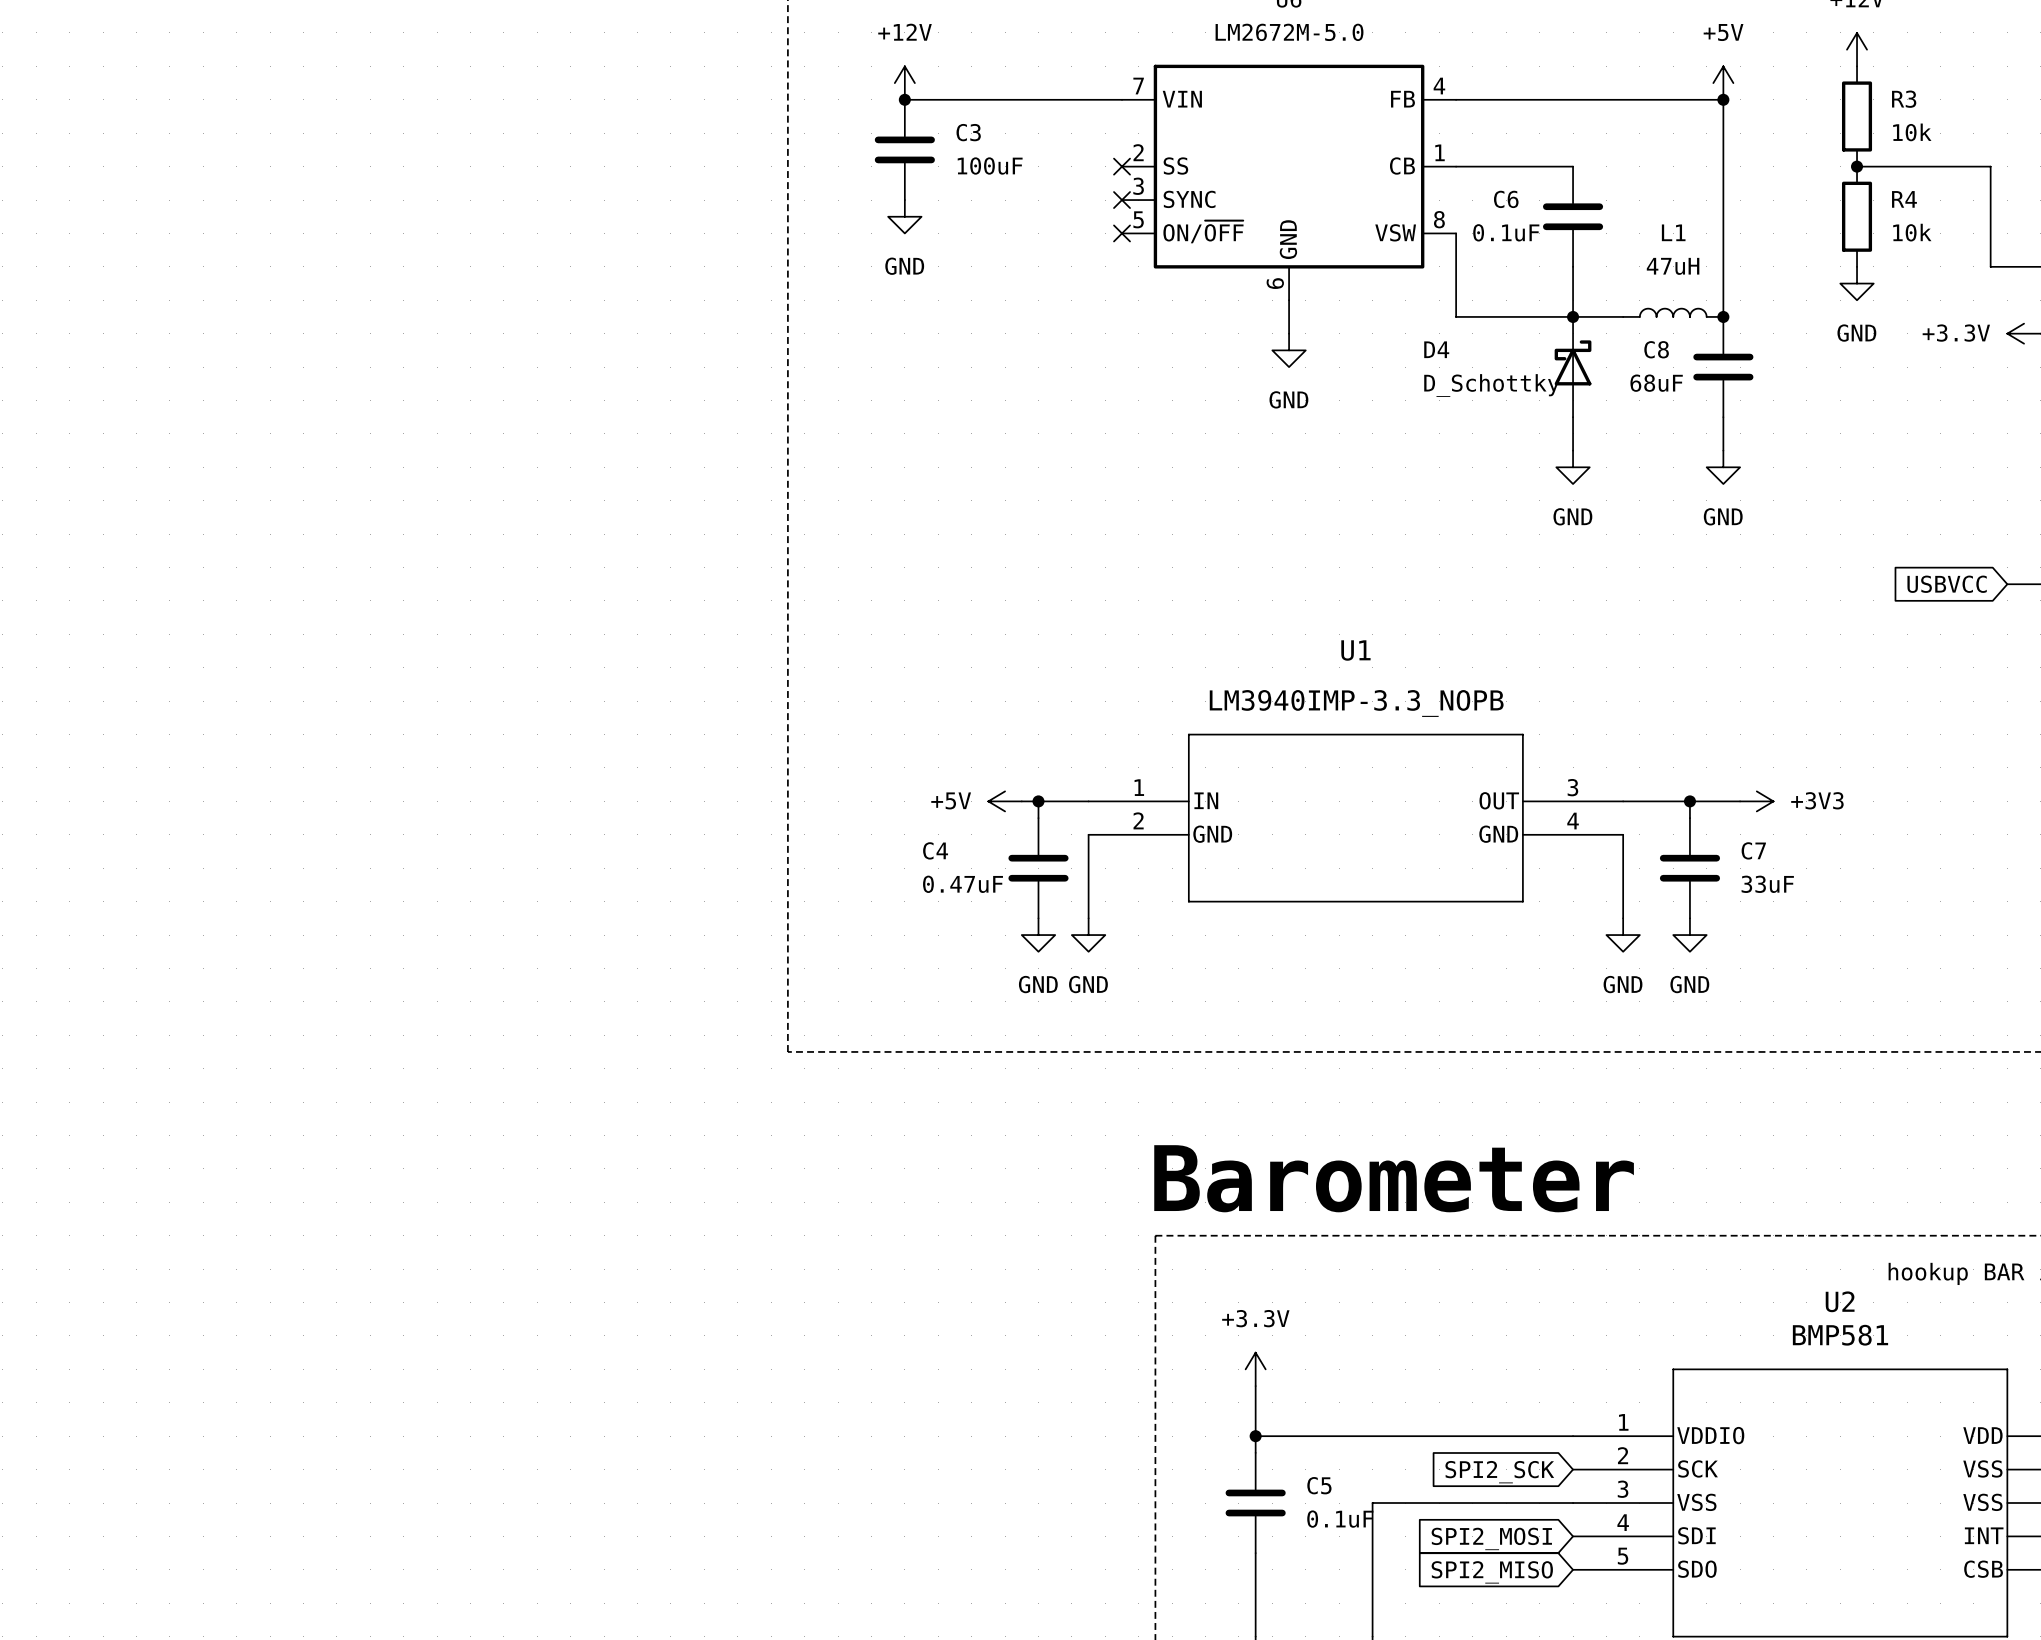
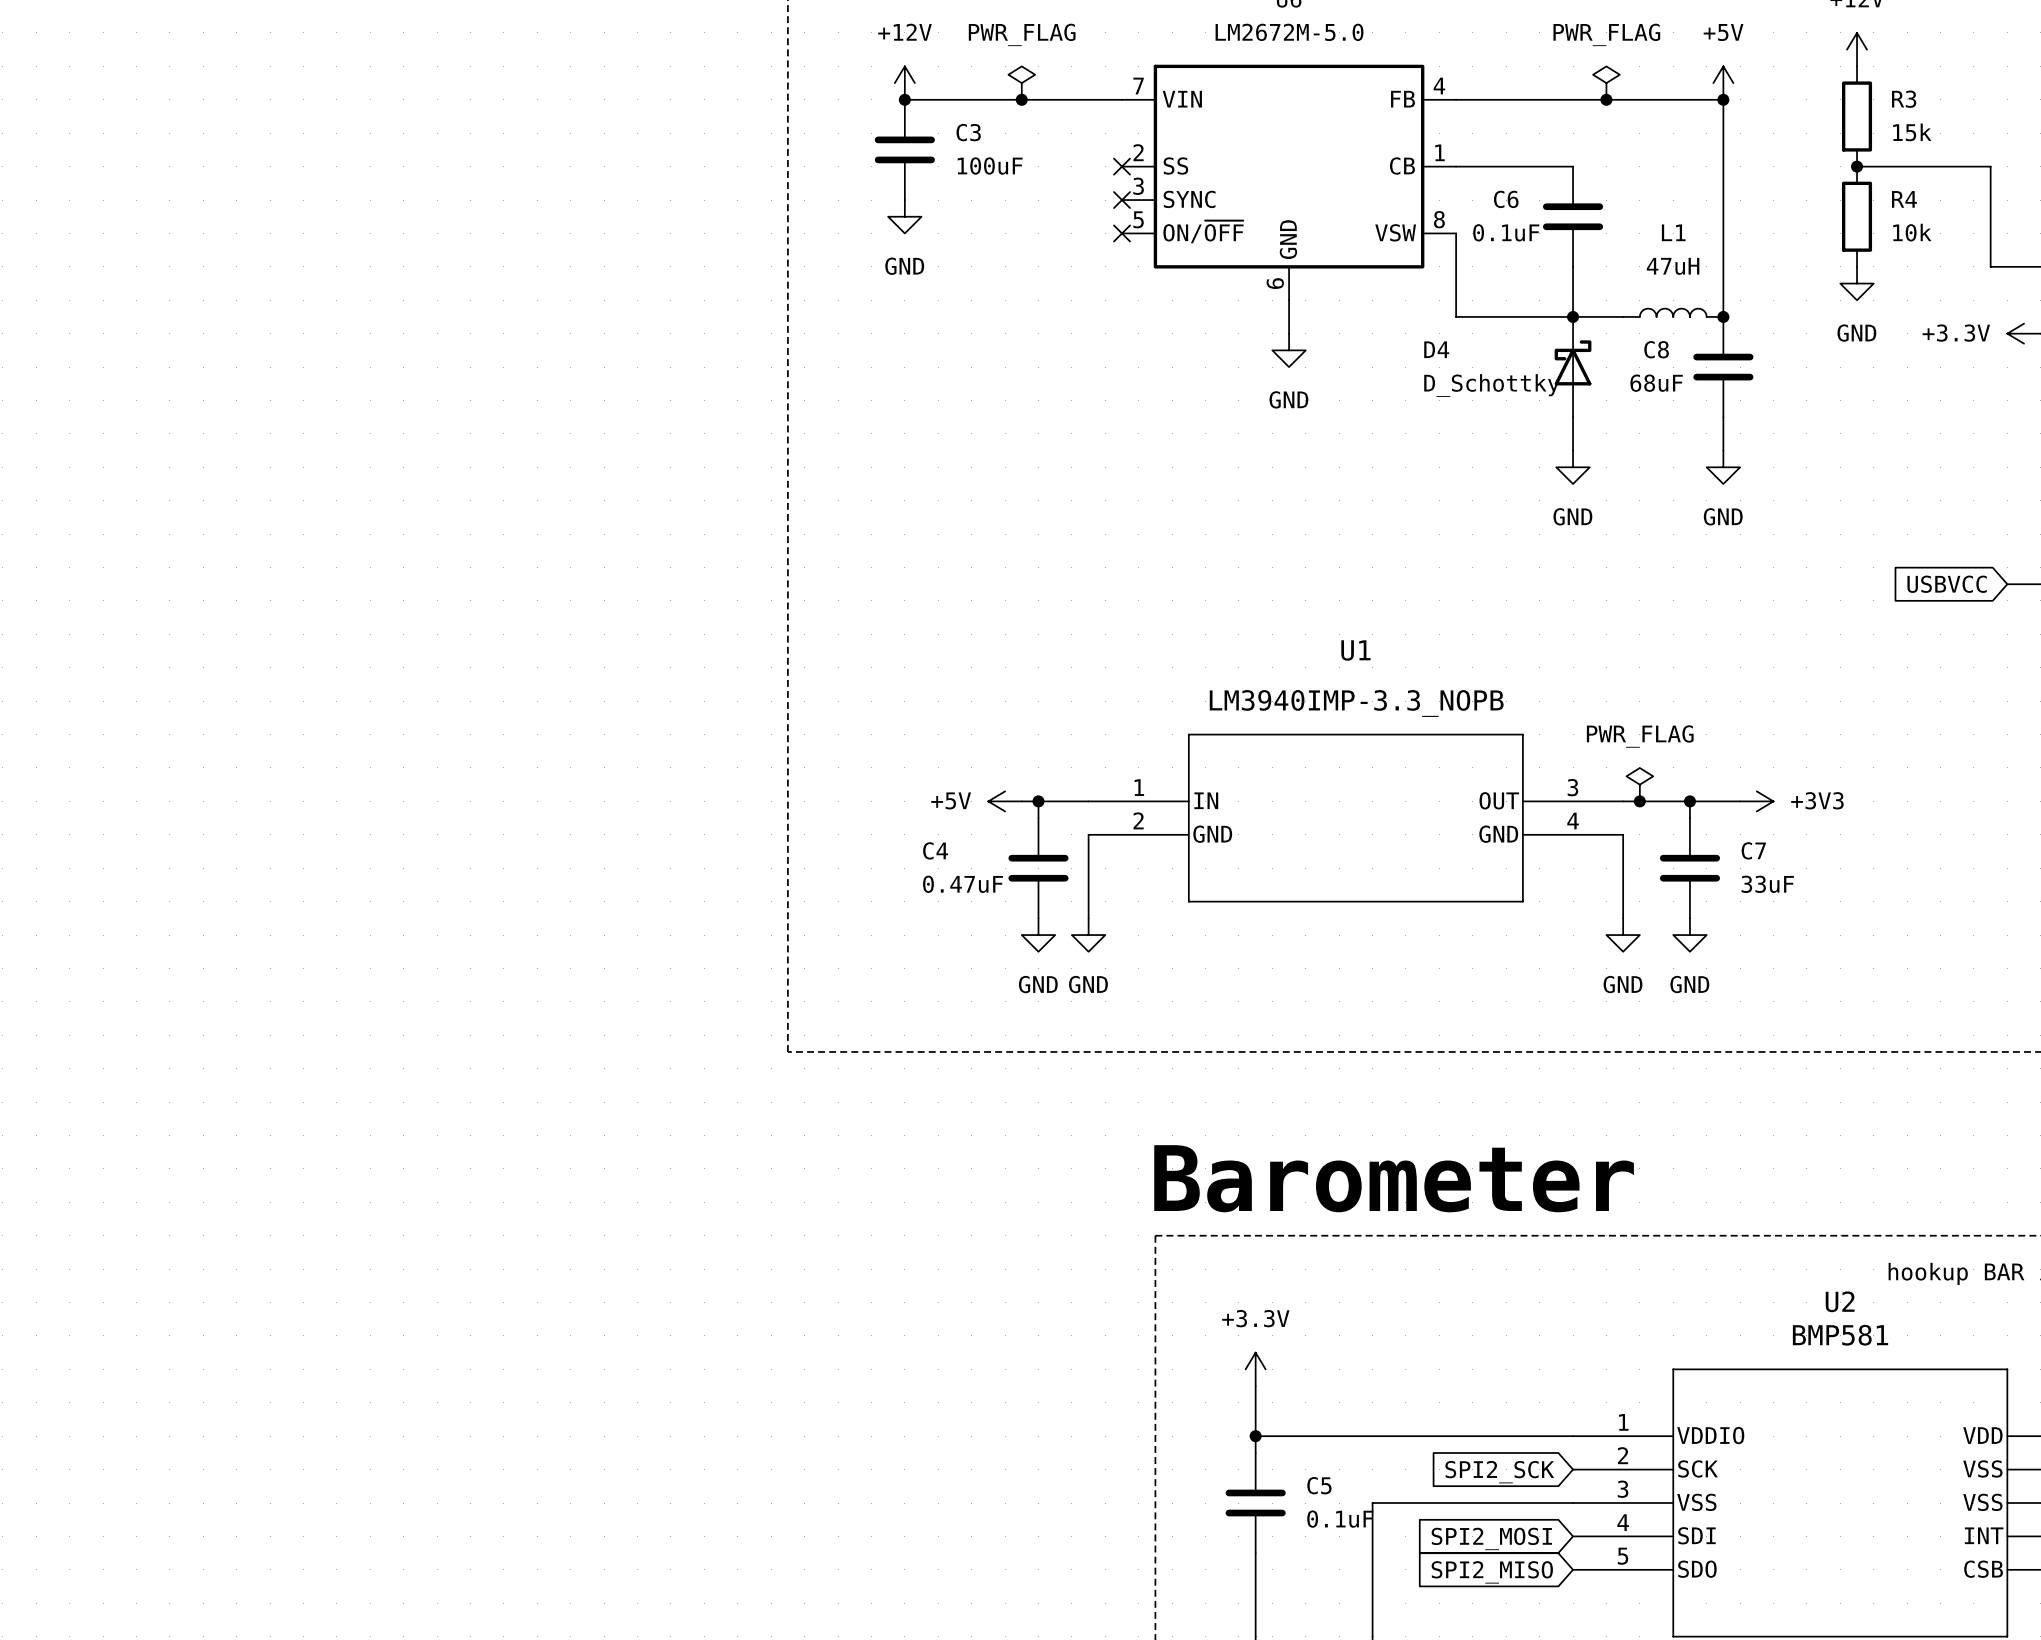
power symbol: none -> PWR_FLAG (1021, 83)
power symbol: none -> PWR_FLAG (1606, 83)
junction: none -> (1021, 99)
junction: none -> (1606, 99)
R3 value: 10k (1912, 132) -> 15k (1912, 132)
power symbol: none -> PWR_FLAG (1639, 784)
junction: none -> (1639, 801)

